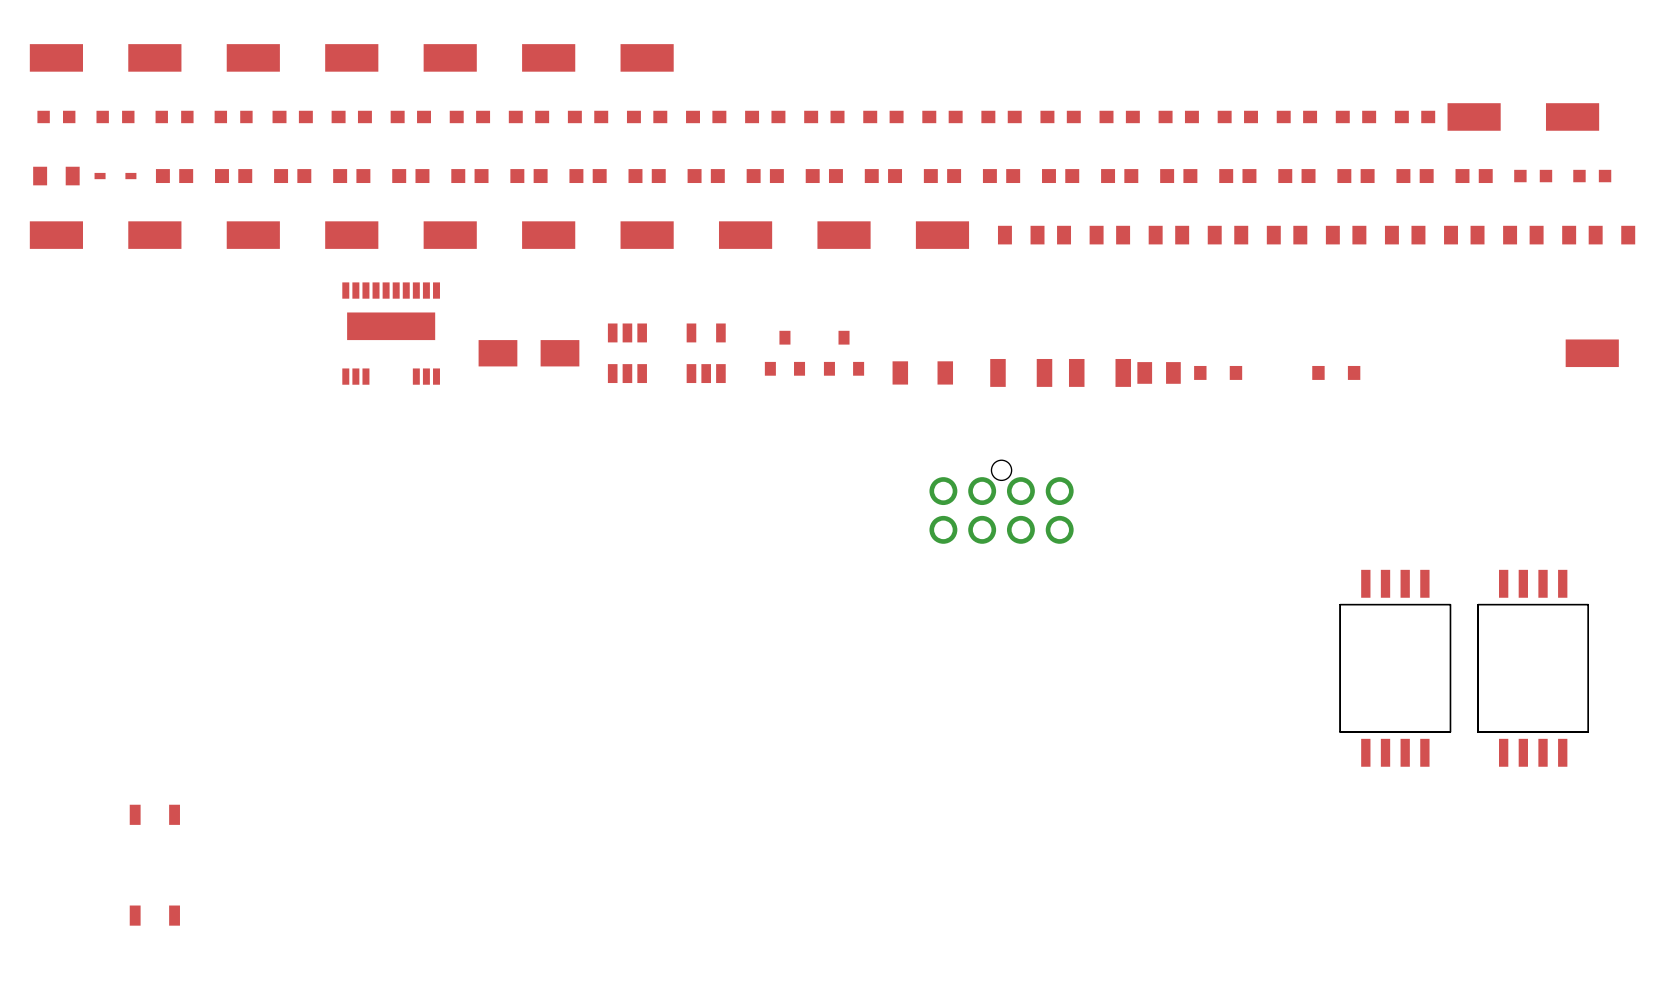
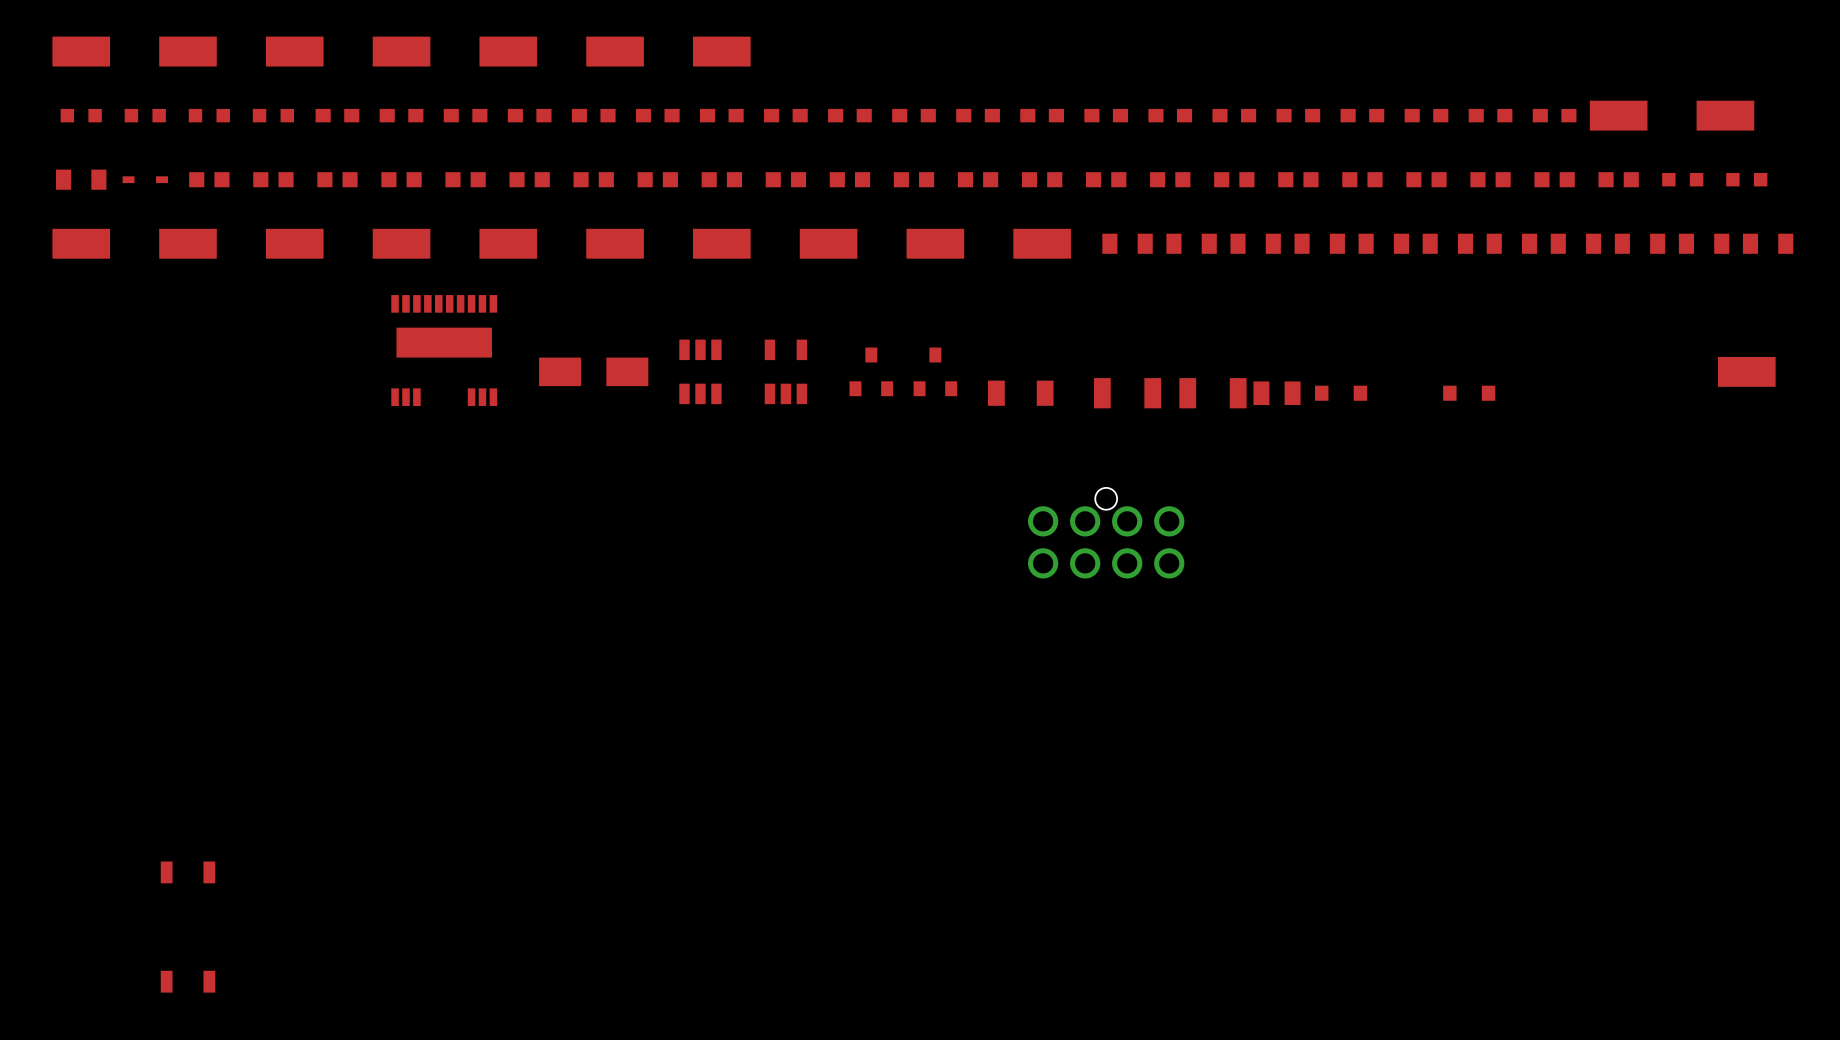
part: (1395, 668) -> none
part: (1533, 668) -> none

